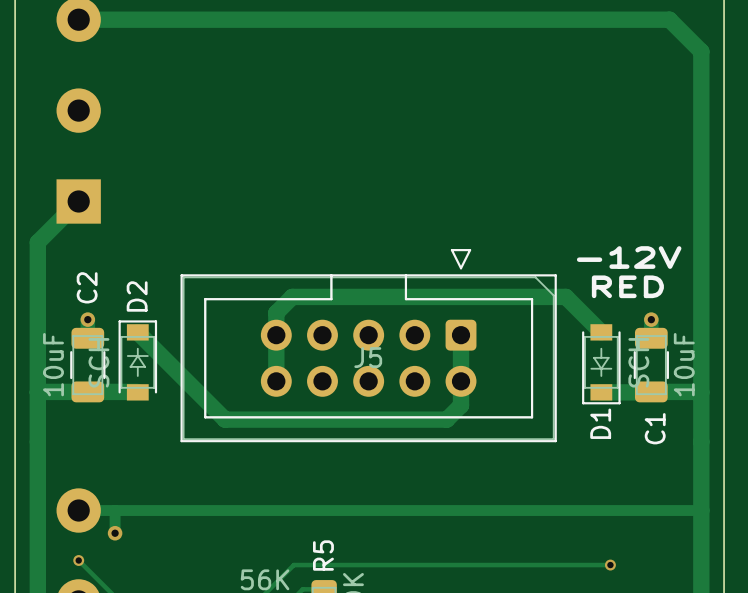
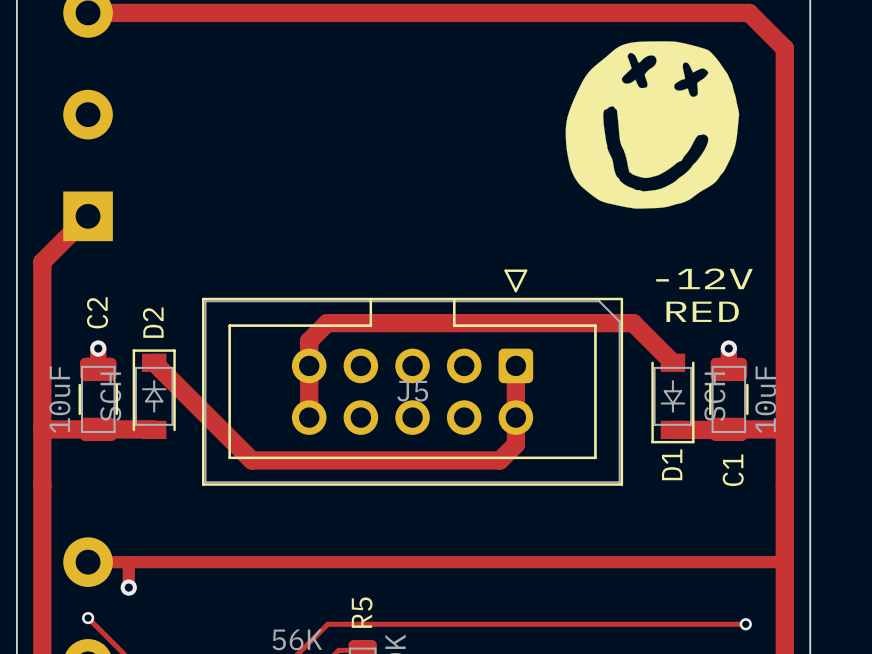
drawing: none -> [565, 41, 740, 209]
track: (610, 565) (292, 566) -> (745, 624) (327, 624)
via position: (610, 565) -> (745, 624)

